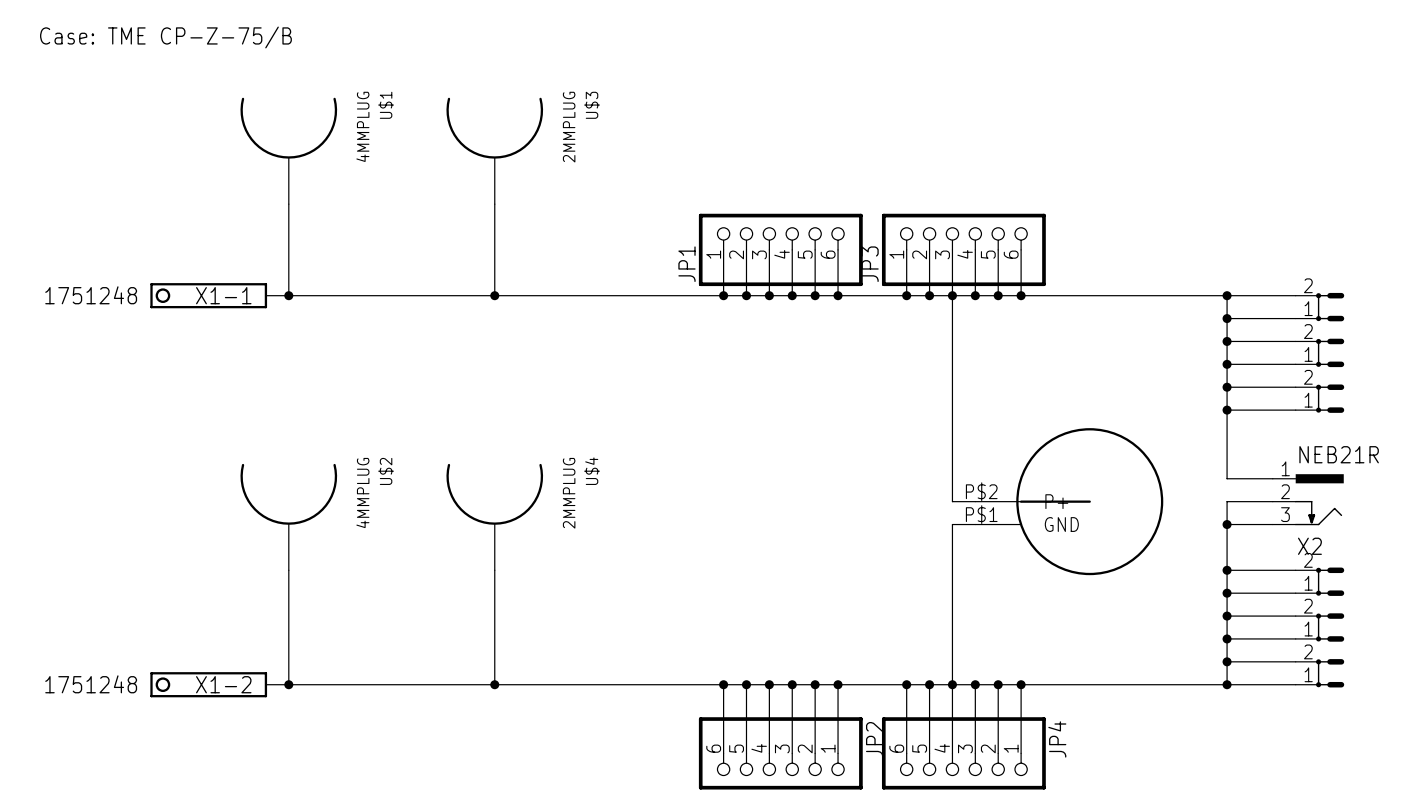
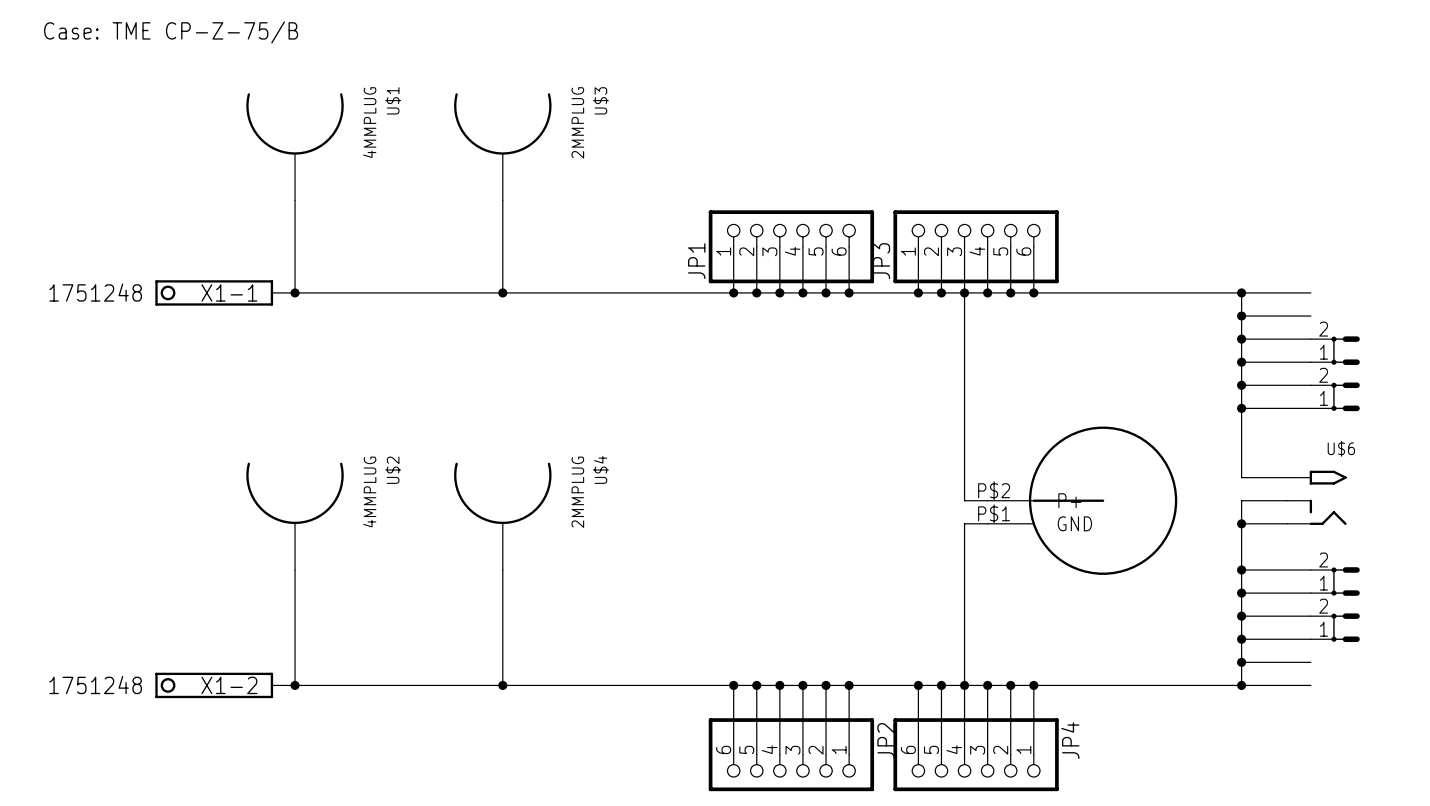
part: (1319, 307) -> none
U$6: none -> (1317, 497)
X2: NEB21R (1308, 499) -> none
part: (1319, 673) -> none

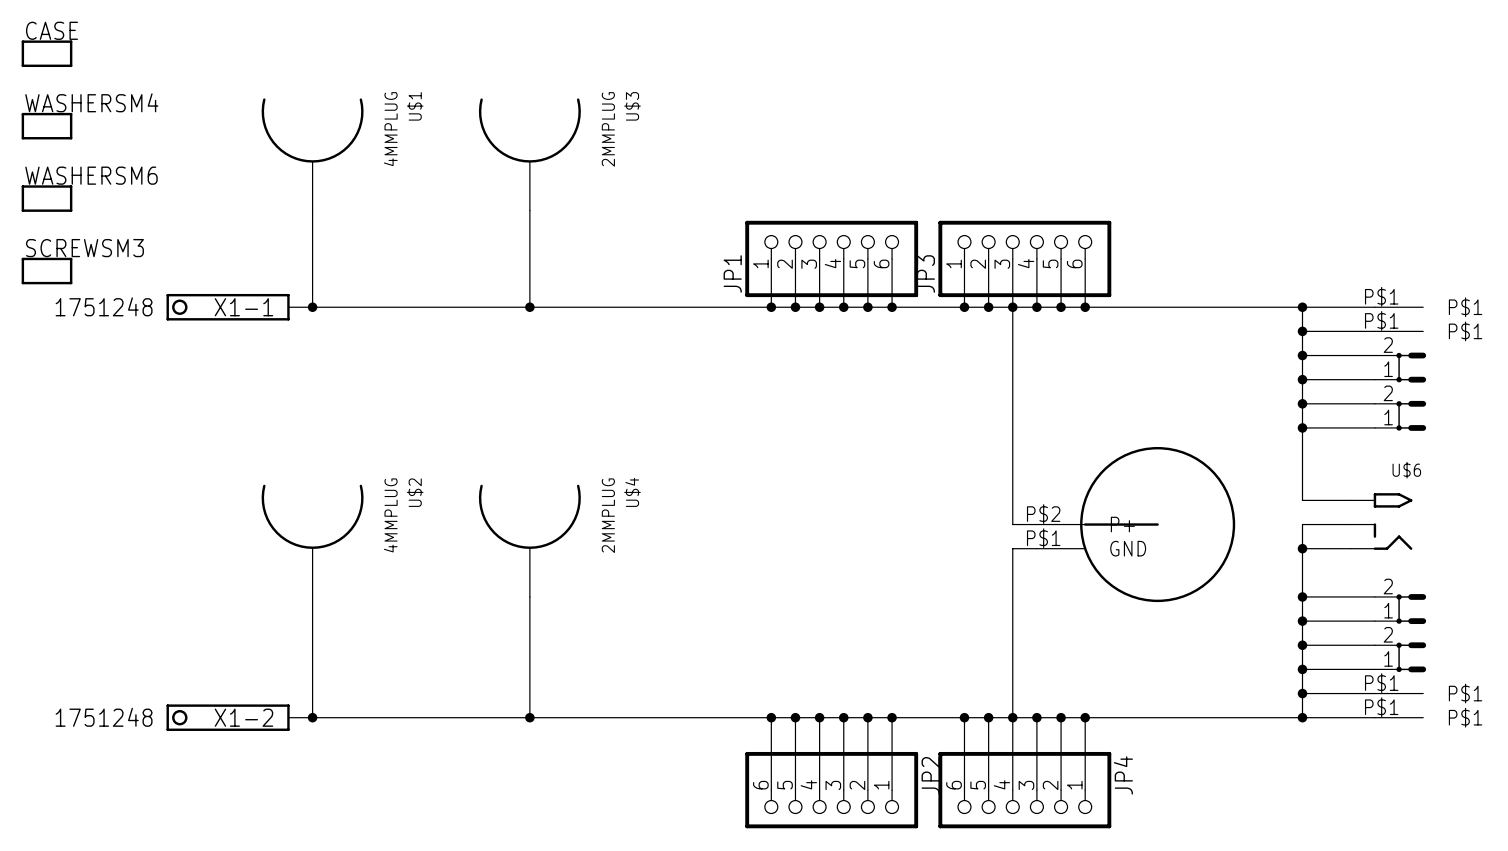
text: Case: TME CP-Z-75/B (171, 32) -> none
CASE: none -> (47, 53)
WASHERSM4: none -> (47, 126)
WASHERSM6: none -> (47, 198)
SCREWSM3: none -> (47, 271)
part: none -> (1399, 307)
part: none -> (1399, 331)
part: none -> (1399, 693)
part: none -> (1399, 717)

